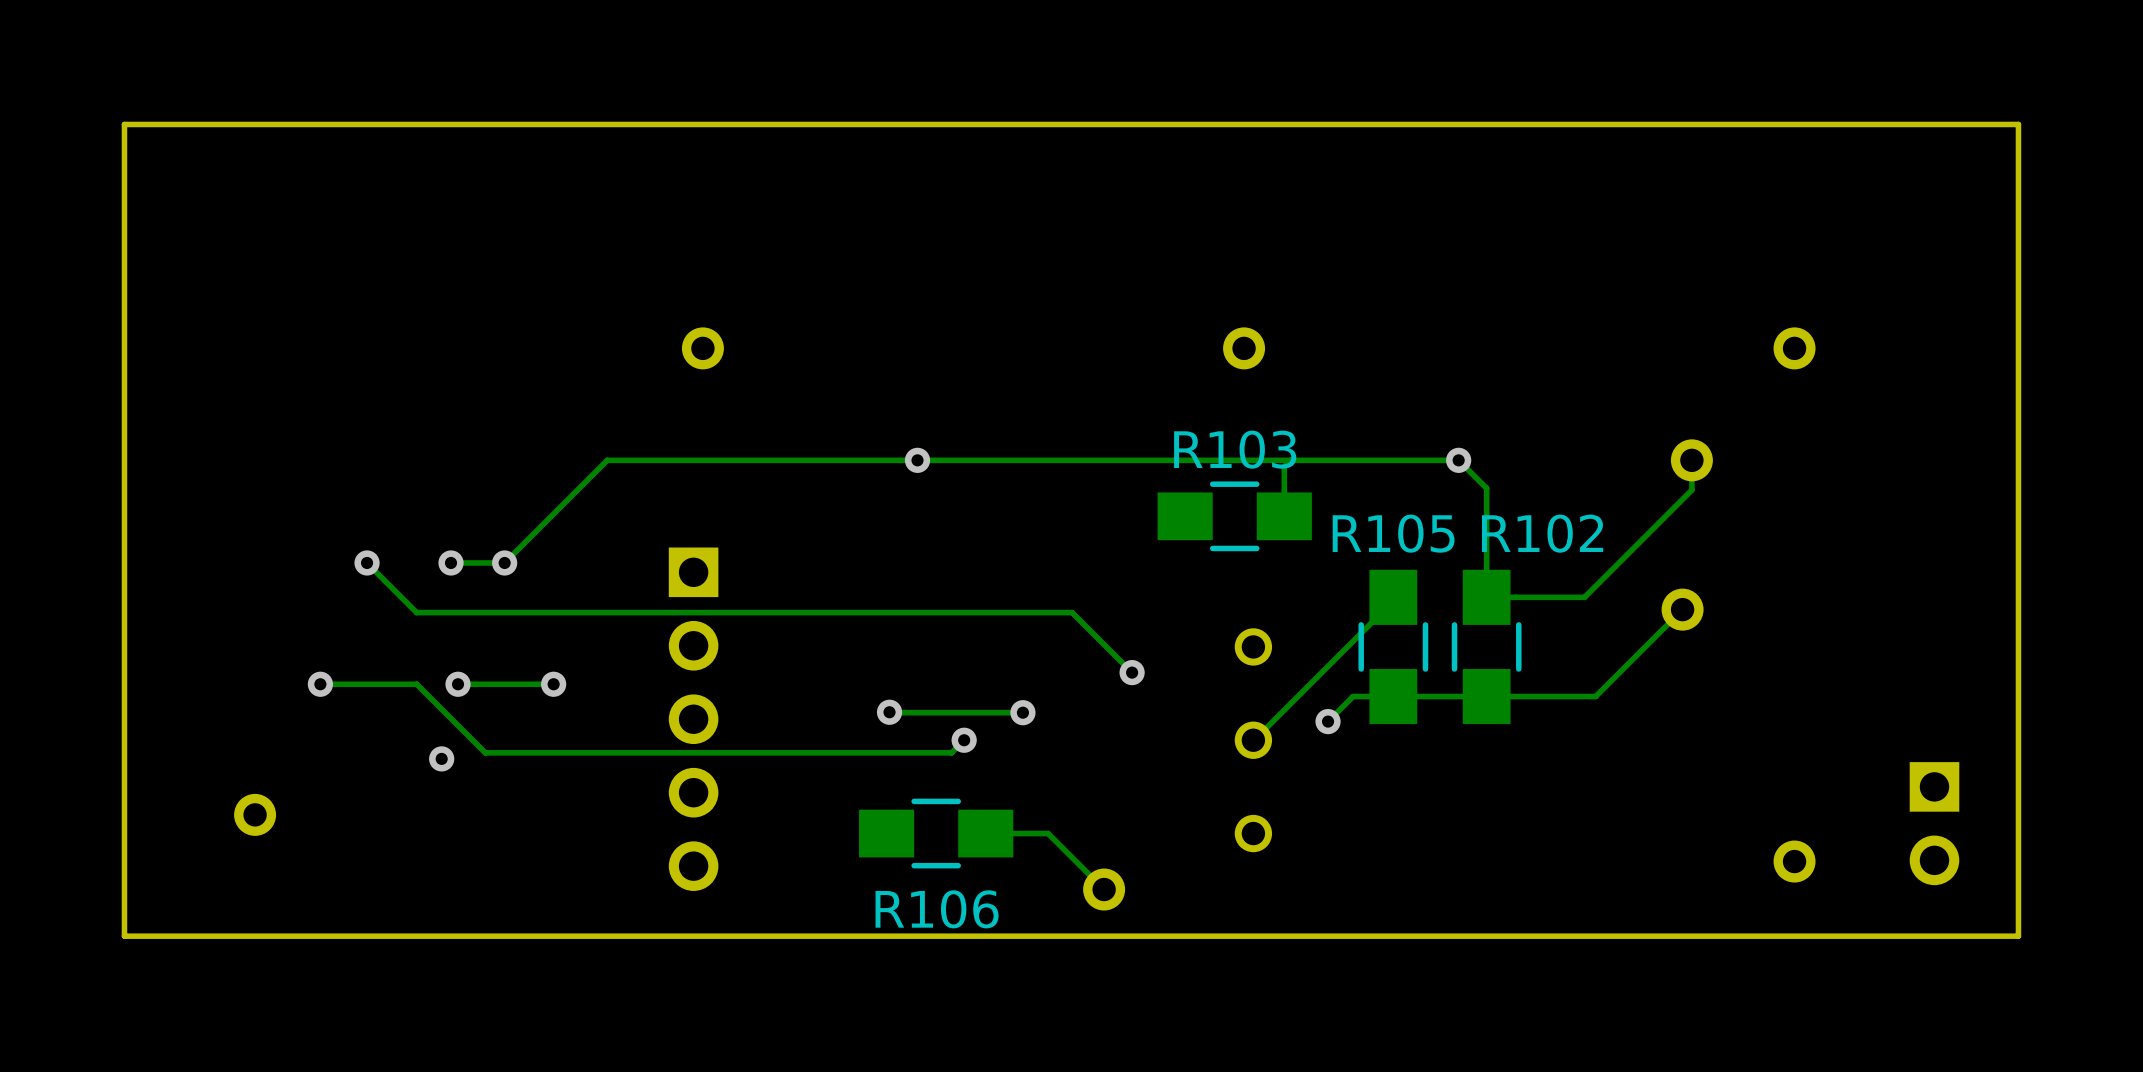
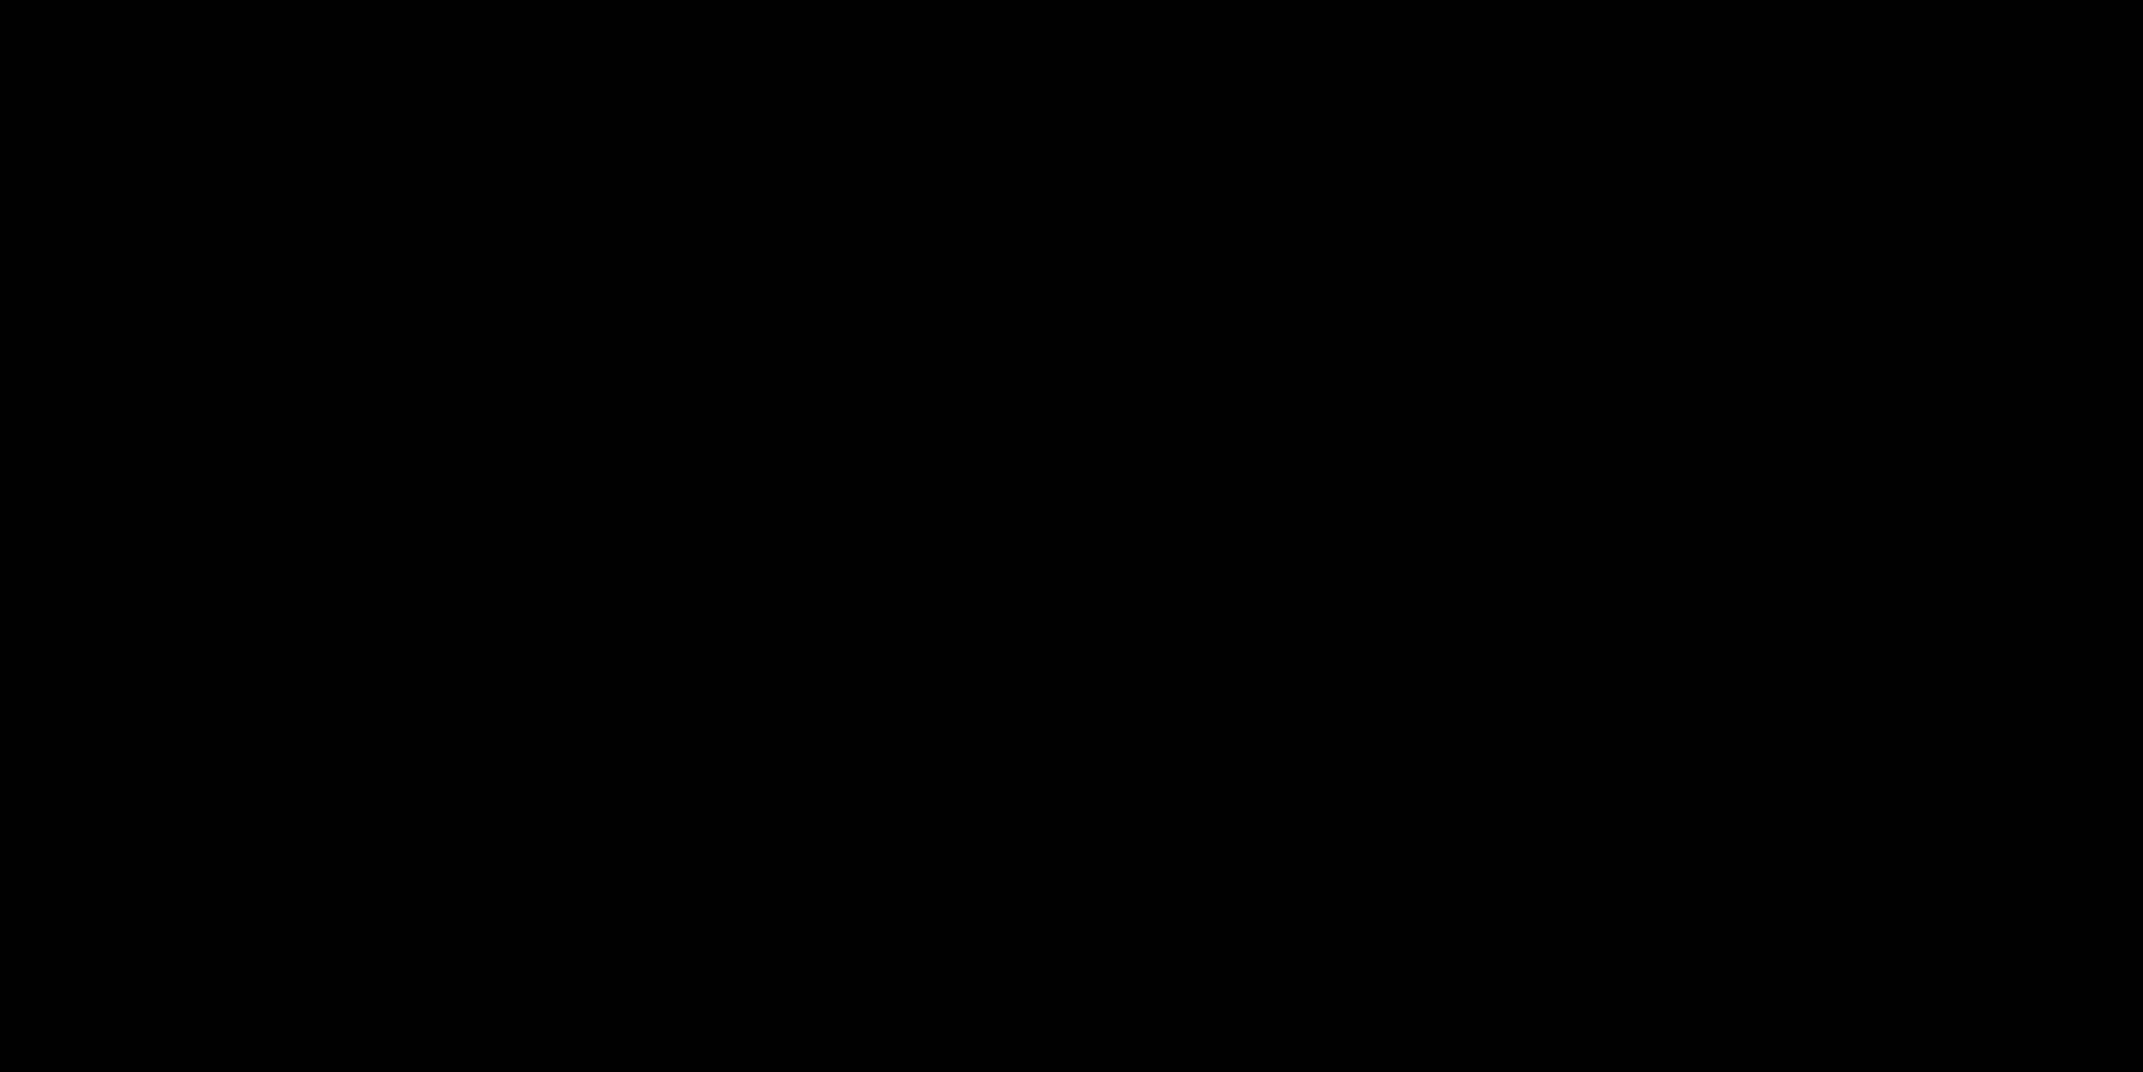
board edge: (2018, 124) (2018, 936) (124, 936) (124, 124) (2018, 124) -> none
part: (702, 348) -> none
part: (1244, 348) -> none
part: (1794, 348) -> none
via: (917, 460) -> none
track: (1290, 460) (1284, 466) (1284, 516) -> none
via: (1458, 460) -> none
track: (1691, 460) (1691, 490) (1584, 597) (1486, 597) (1486, 488) (1458, 460) (607, 460) (504, 562) (451, 562) -> none
part: (1691, 460) -> none
R103: (1234, 516) -> none
track: (367, 562) (416, 612) (1072, 612) (1132, 672) -> none
via: (367, 562) -> none
via: (451, 562) -> none
via: (504, 562) -> none
track: (1393, 597) (1393, 601) (1254, 740) -> none
track: (1682, 609) (1595, 696) (1353, 696) (1328, 721) -> none
part: (1682, 609) -> none
R105: (1393, 646) -> none
R102: (1486, 646) -> none
via: (1132, 672) -> none
track: (320, 684) (416, 684) (485, 752) (951, 752) (964, 740) -> none
via: (320, 684) -> none
via: (458, 684) -> none
track: (553, 684) (458, 684) -> none
via: (553, 684) -> none
via: (889, 712) -> none
track: (1022, 712) (889, 712) -> none
via: (1022, 712) -> none
part: (693, 719) -> none
via: (1328, 721) -> none
via: (964, 740) -> none
part: (1253, 740) -> none
via: (441, 758) -> none
part: (255, 814) -> none
part: (1934, 823) -> none
R106: (936, 833) -> none
track: (985, 833) (1048, 833) (1104, 889) -> none
part: (1794, 861) -> none
part: (1104, 889) -> none

